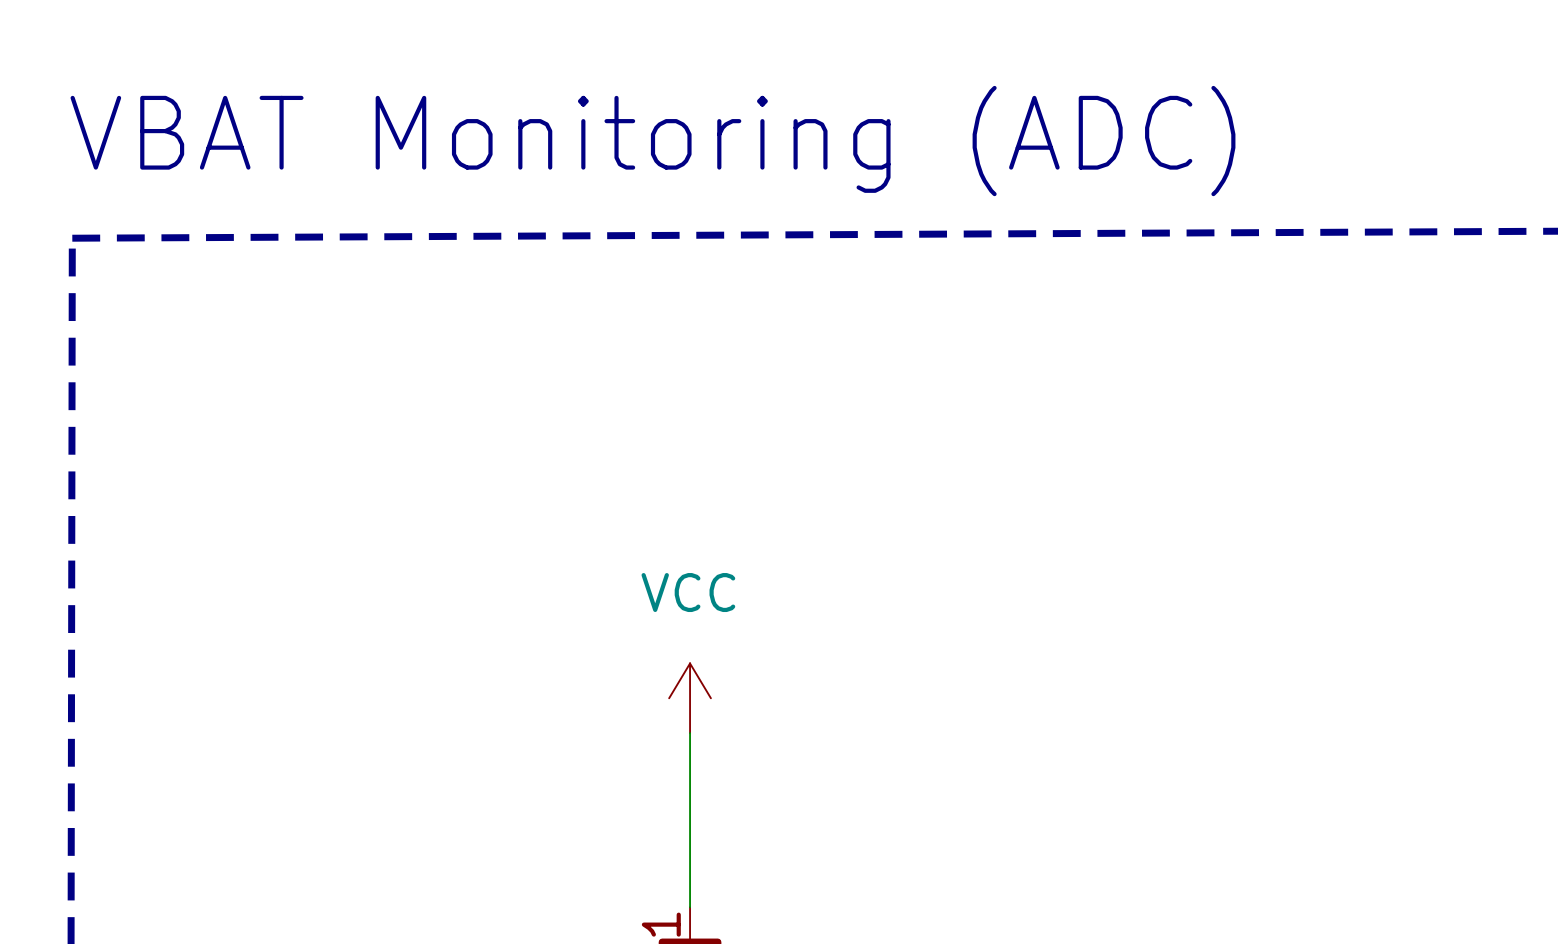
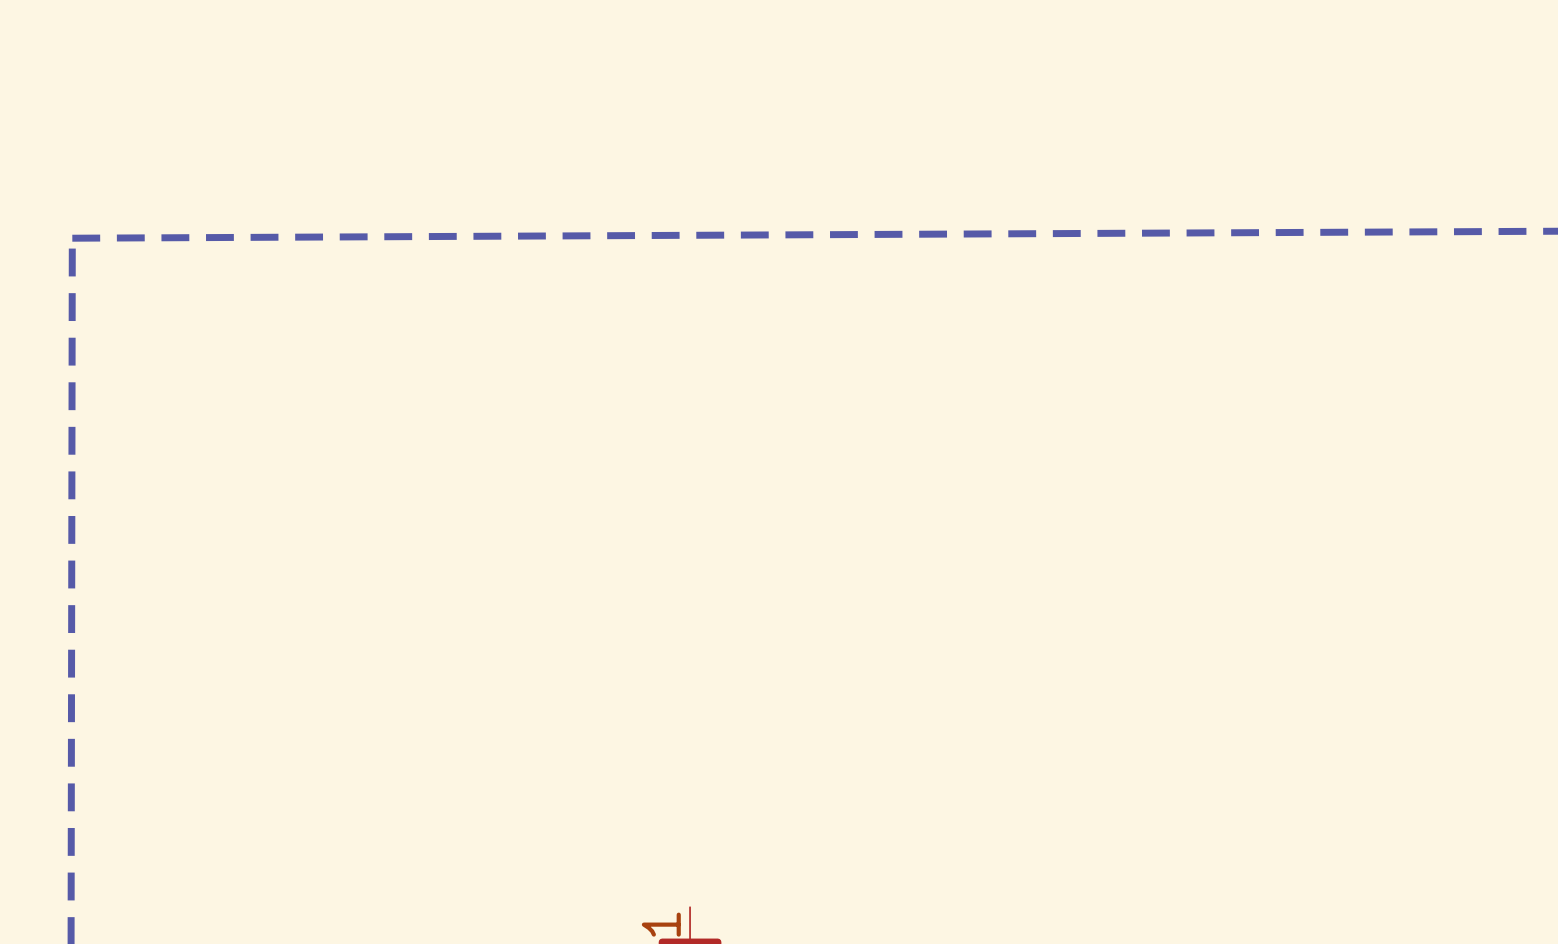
text: VBAT Monitoring (ADC) (653, 141) -> none
power symbol: VCC (690, 698) -> none
wire: (690, 733) (690, 907) -> none

